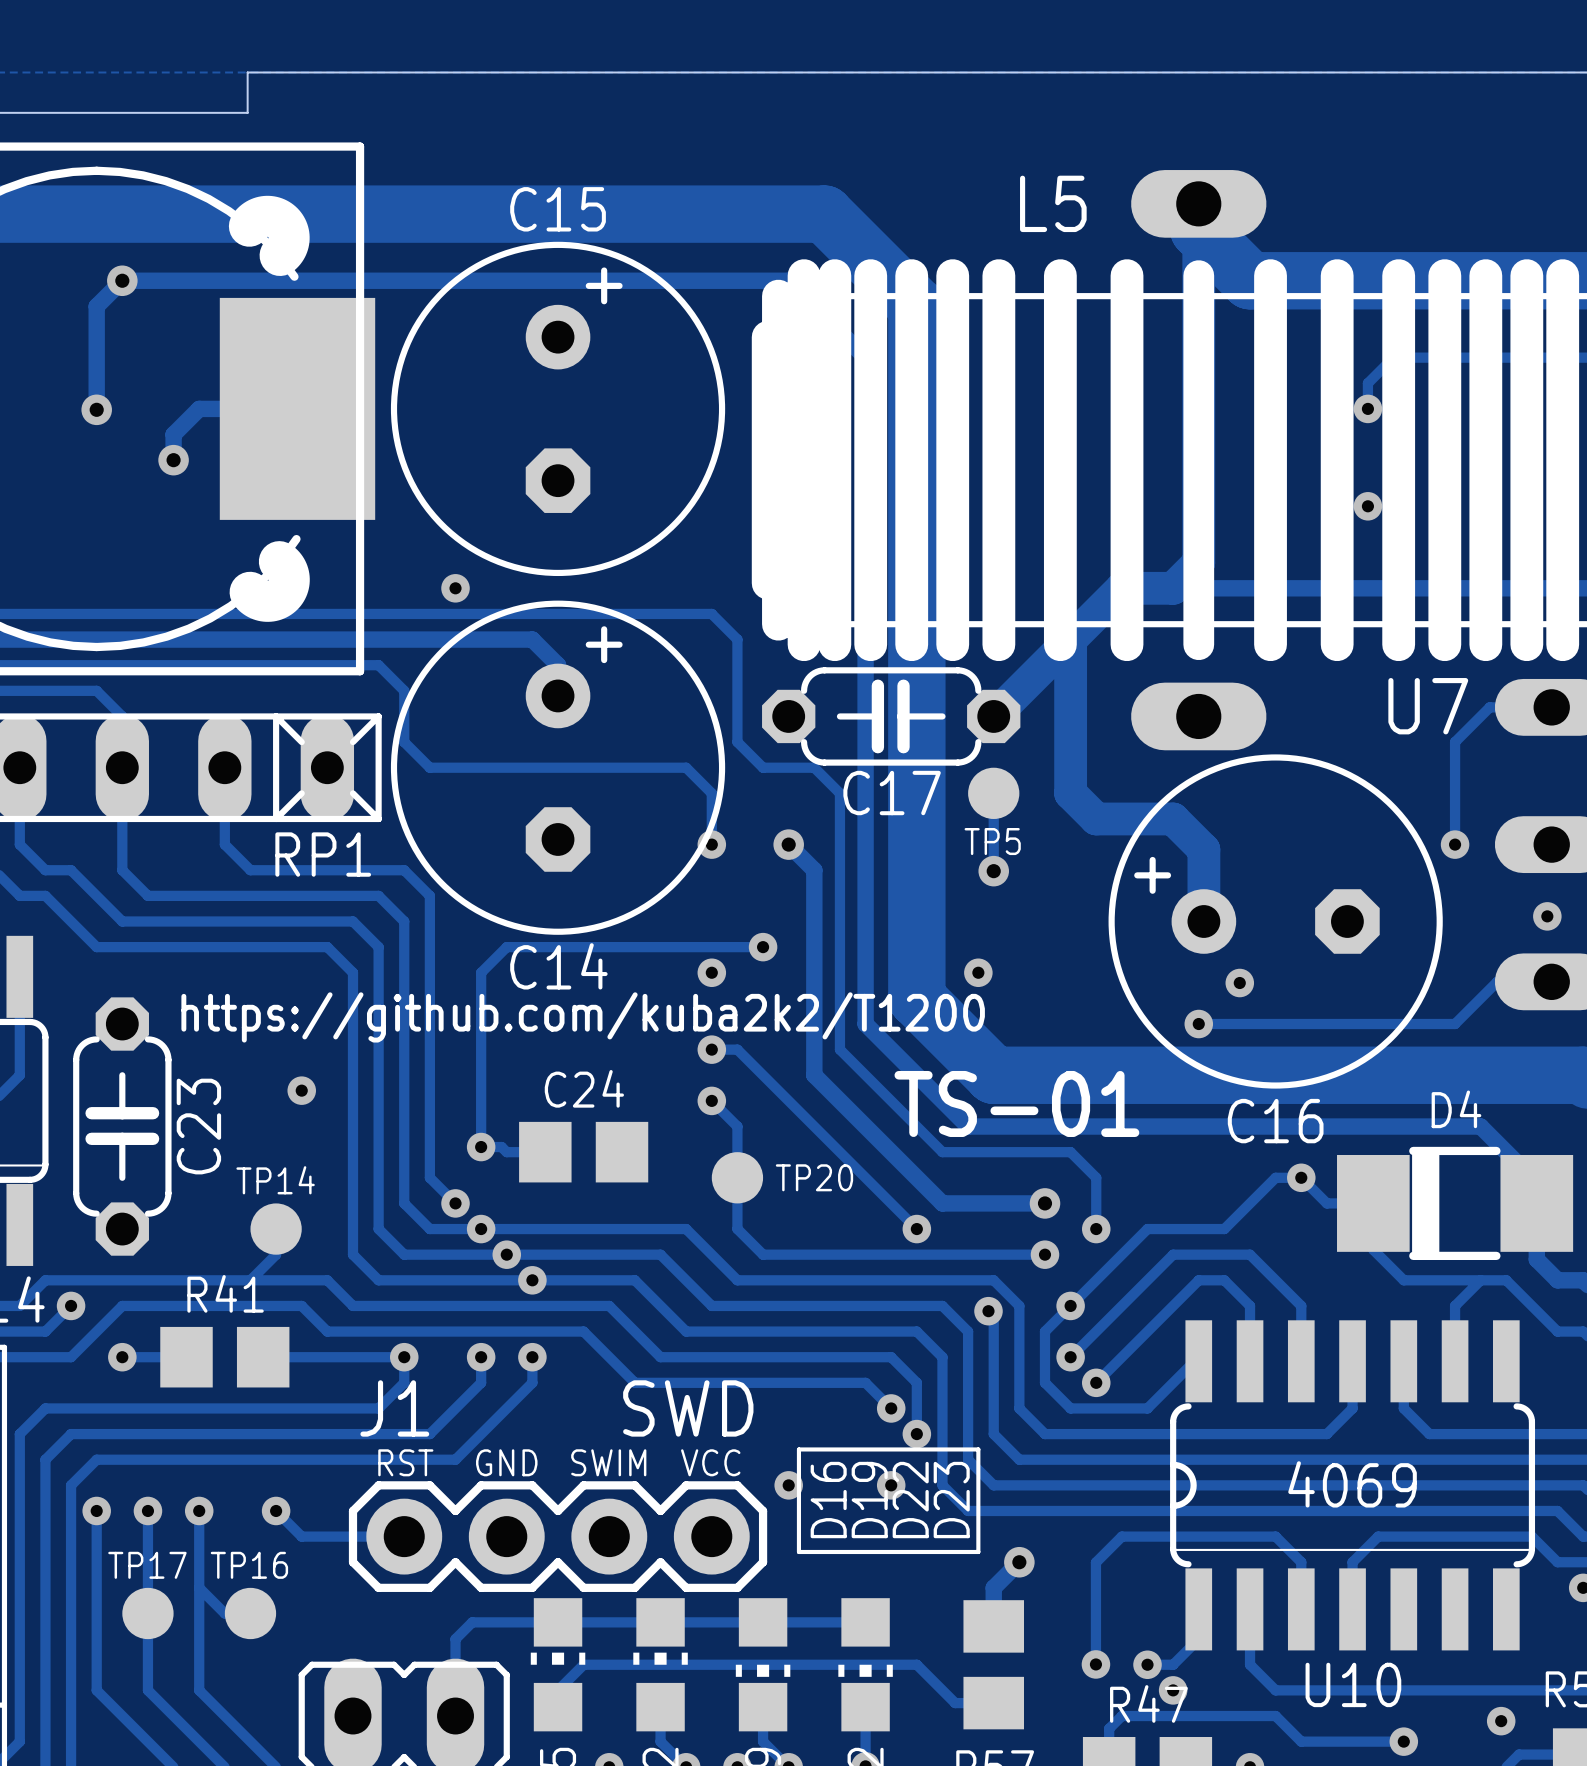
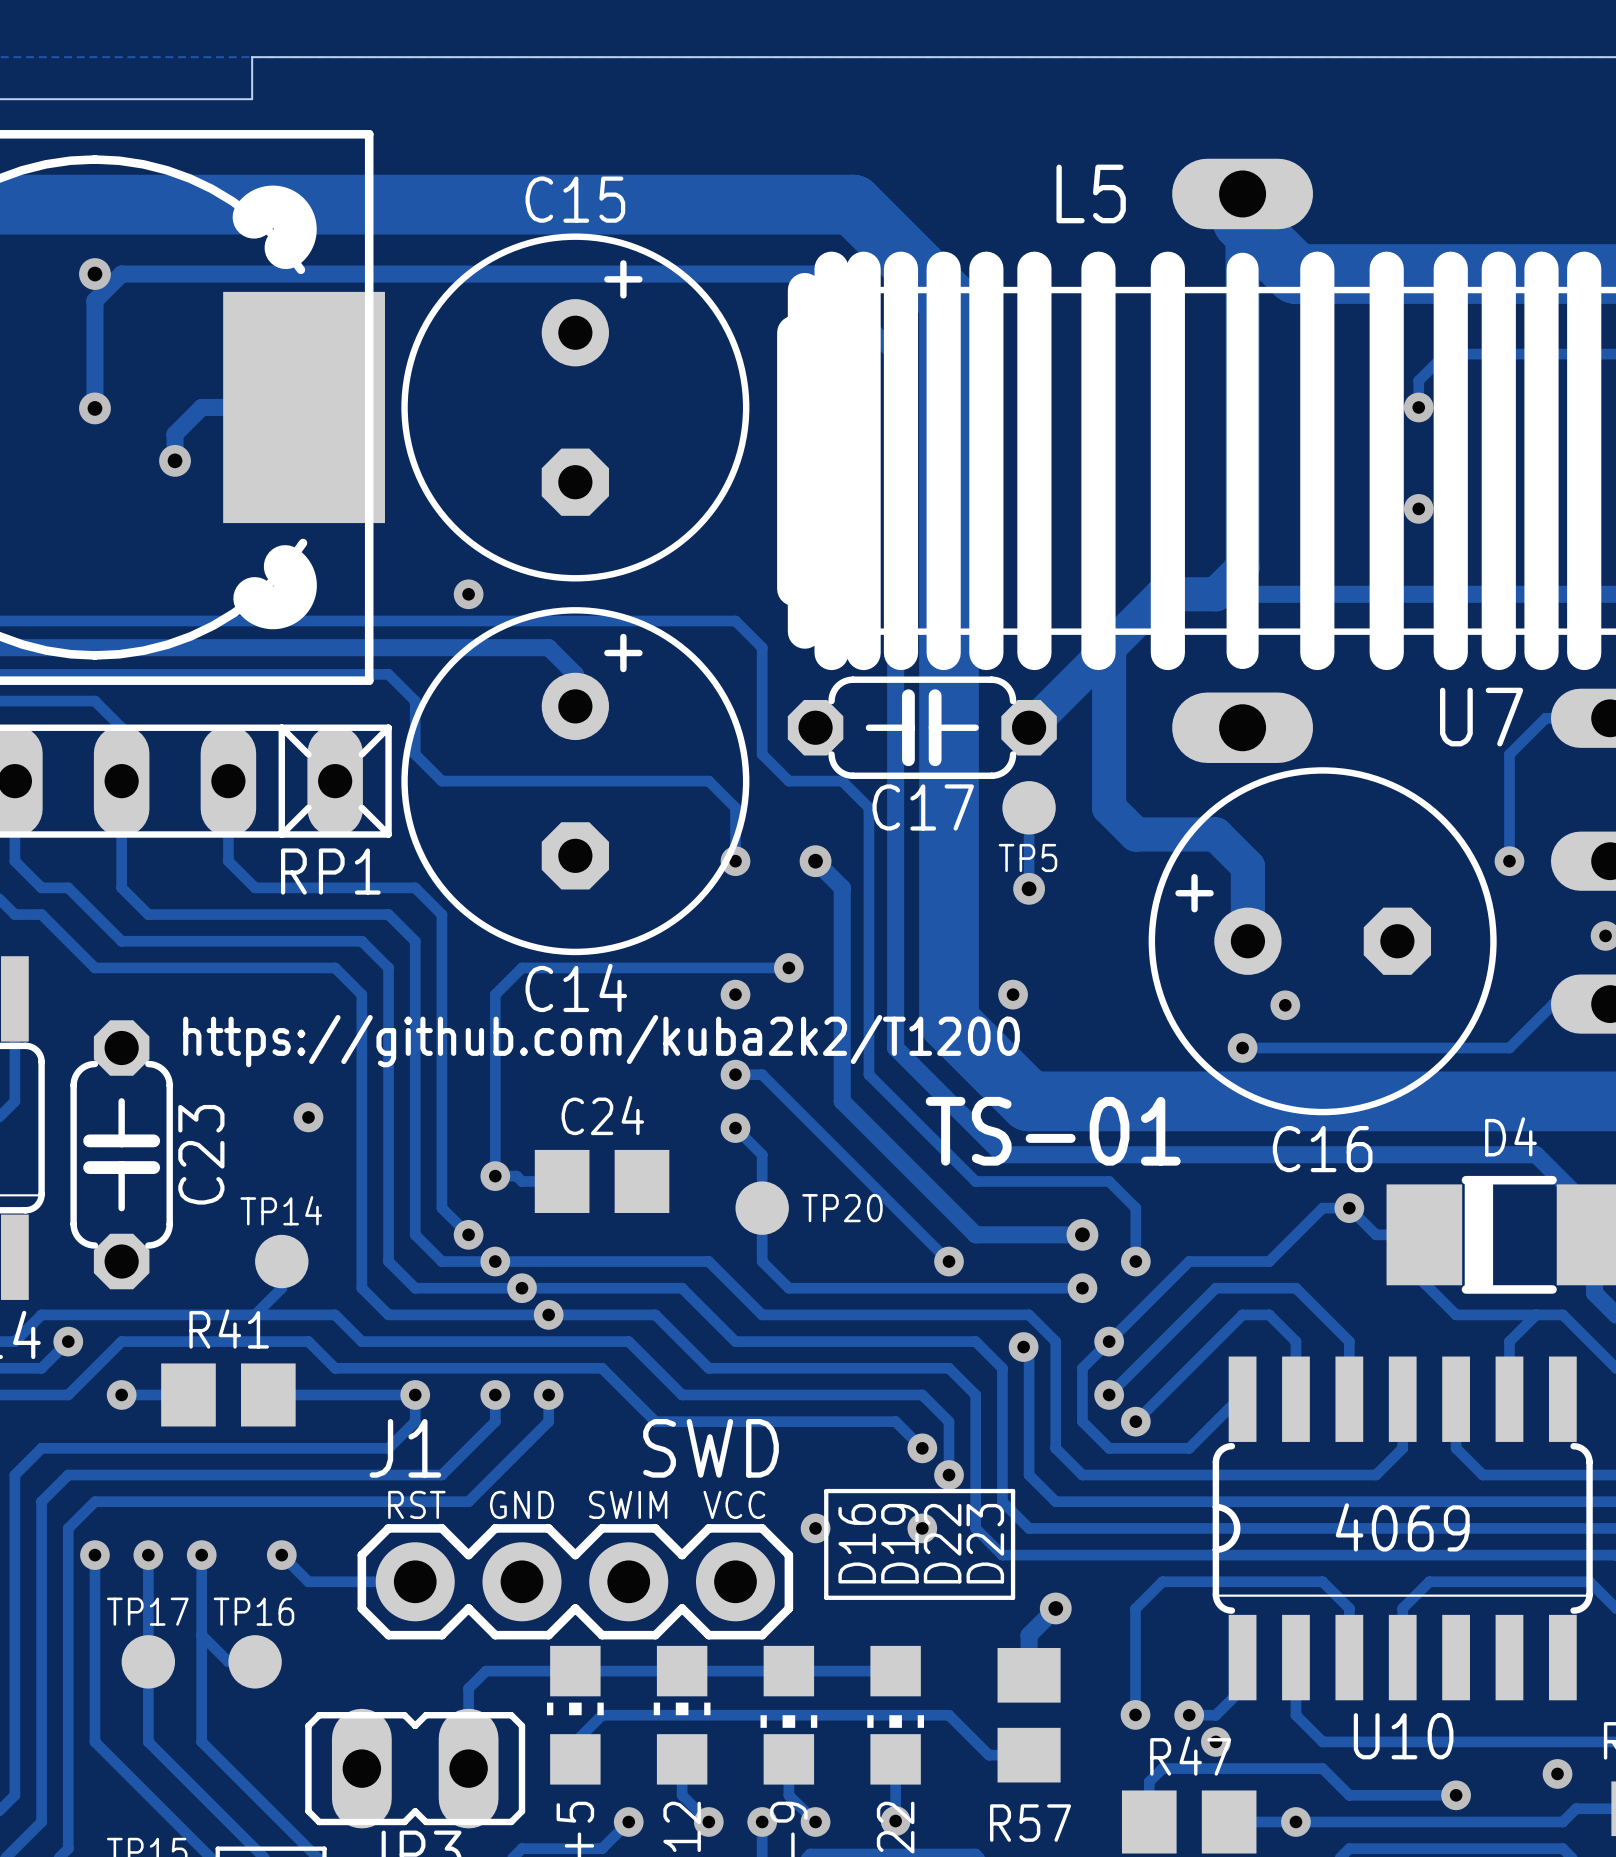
via position: (122, 280) -> (94, 274)

